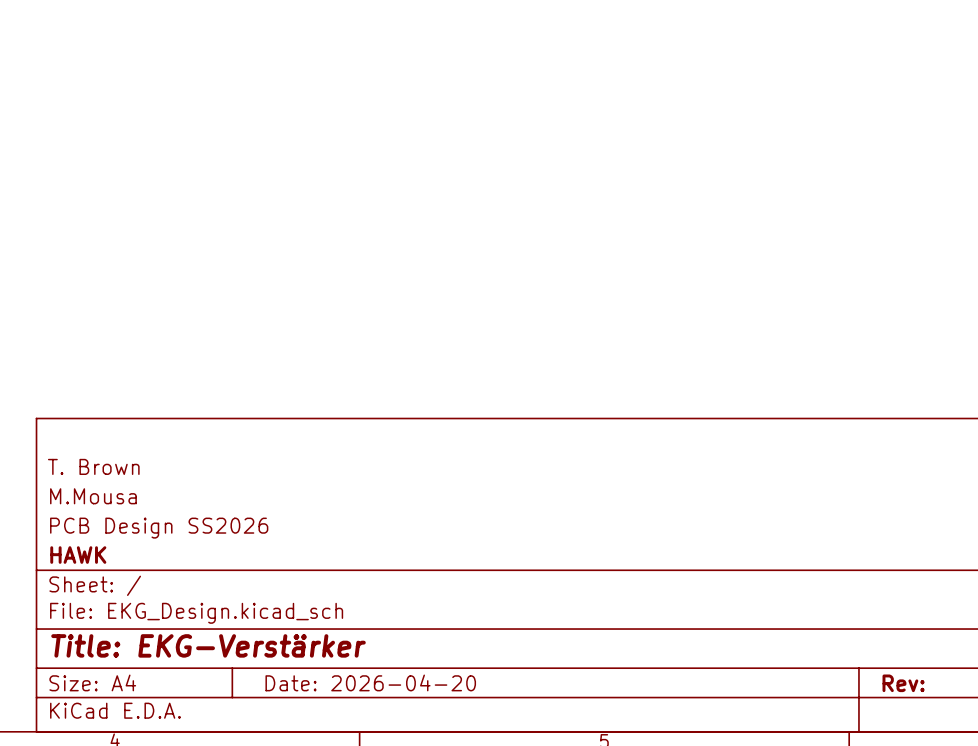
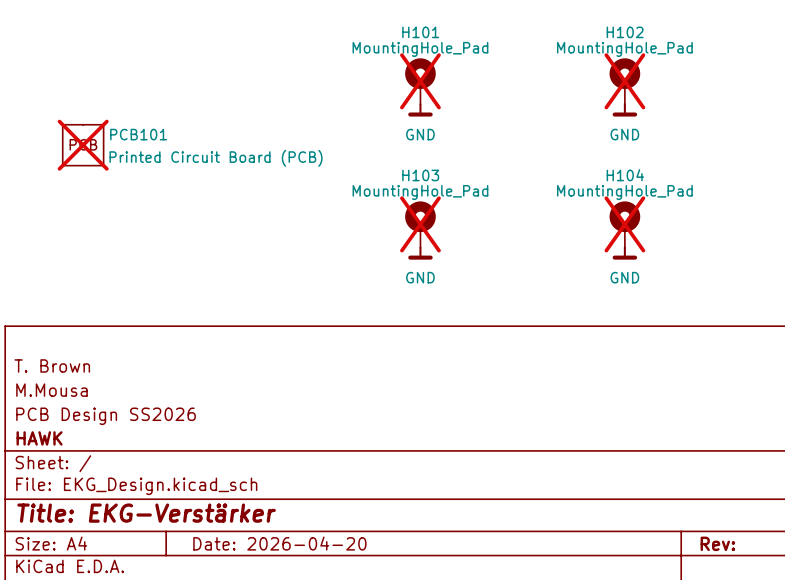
H101: none -> MountingHole_Pad (420, 81)
H102: none -> MountingHole_Pad (624, 81)
power symbol: none -> GND (420, 109)
power symbol: none -> GND (624, 109)
PCB101: none -> Printed Circuit Board (PCB) (83, 145)
H103: none -> MountingHole_Pad (420, 224)
H104: none -> MountingHole_Pad (624, 224)
power symbol: none -> GND (420, 253)
power symbol: none -> GND (624, 253)

